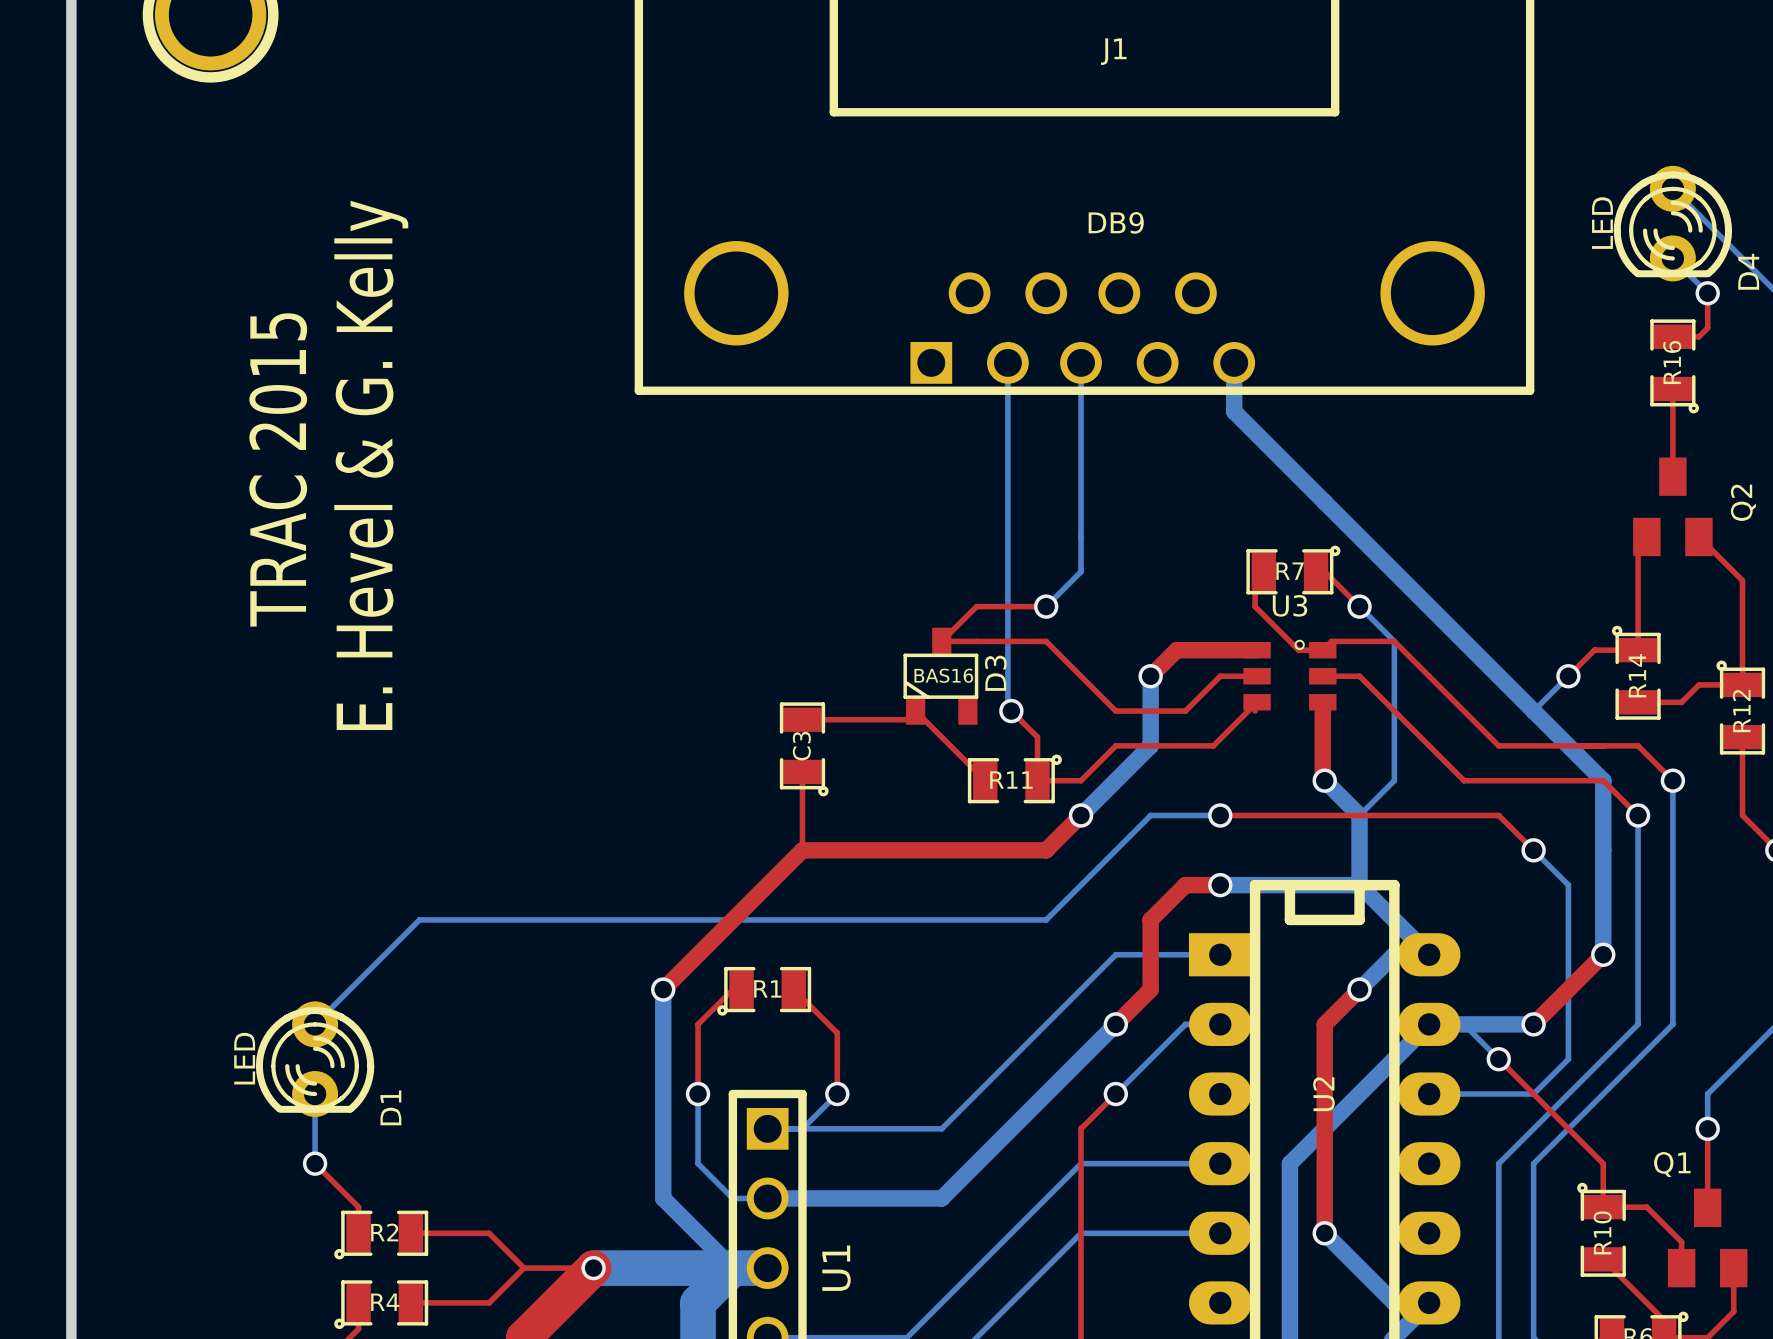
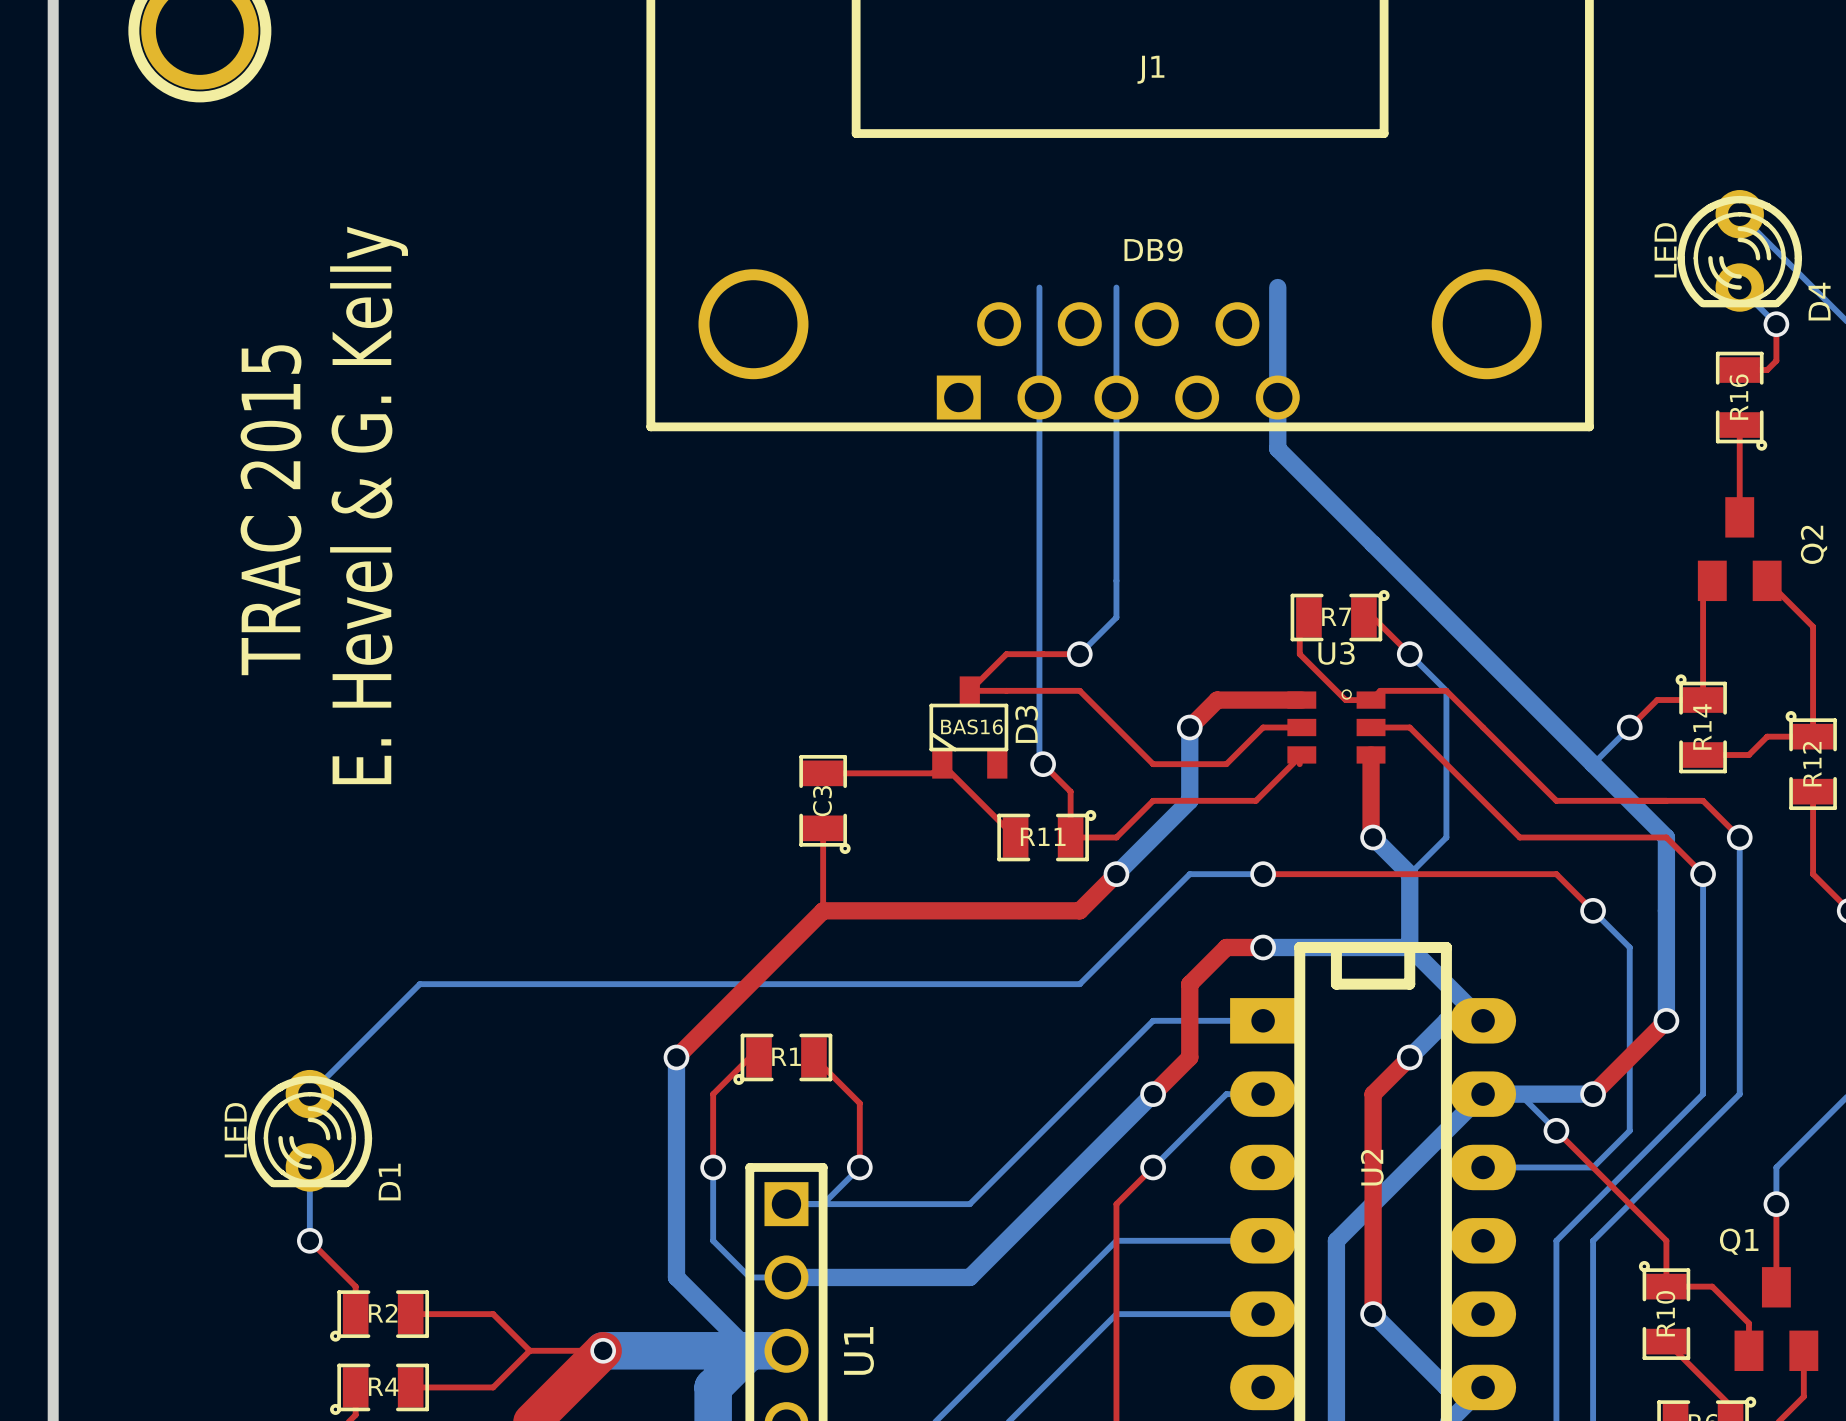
bottom track: none -> (1039, 287) (1039, 397)
bottom track: none -> (1116, 287) (1116, 397)
bottom track: none -> (1277, 287) (1277, 397)

